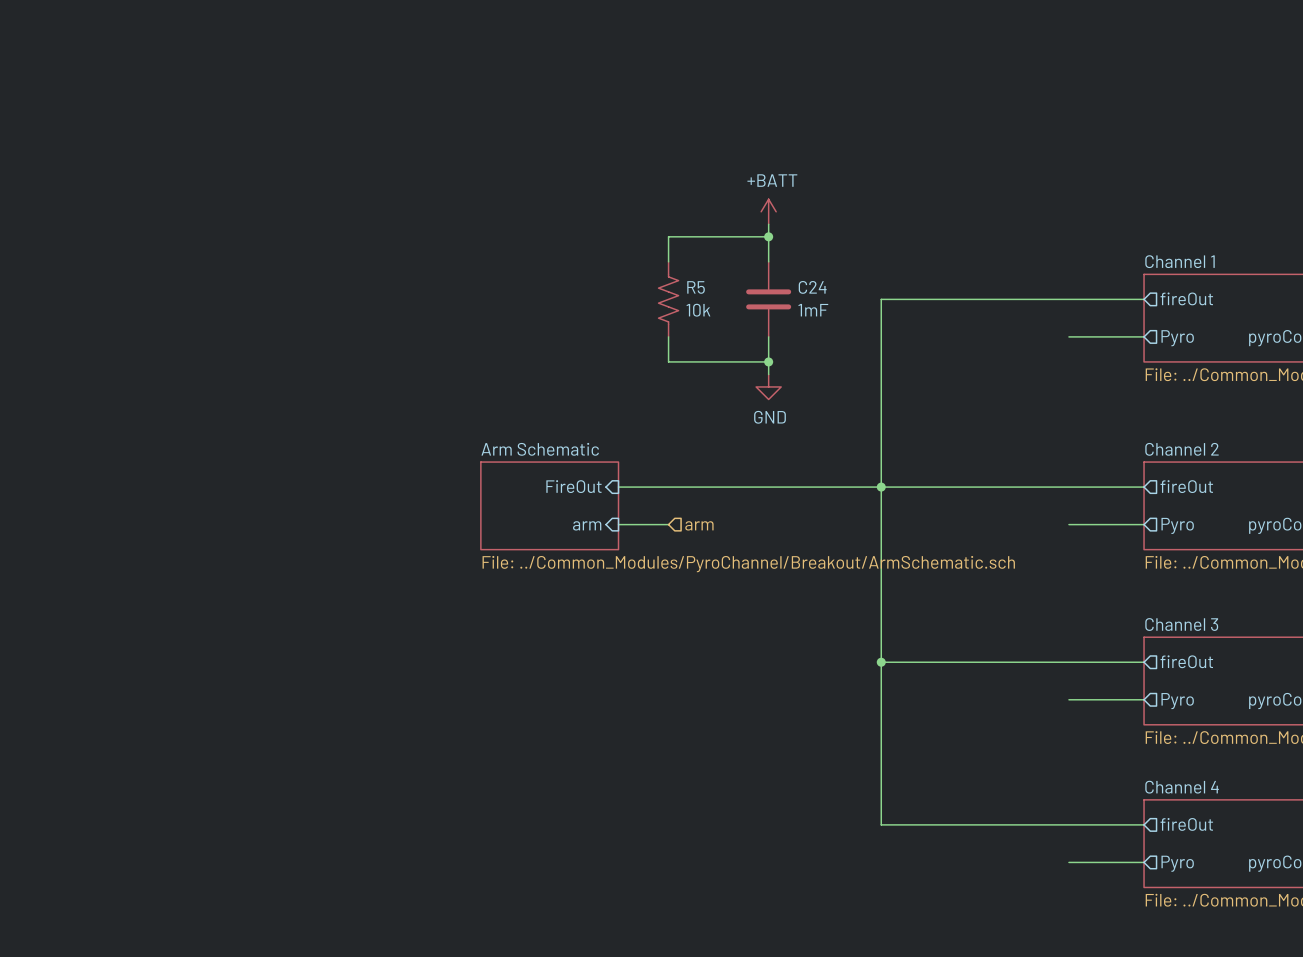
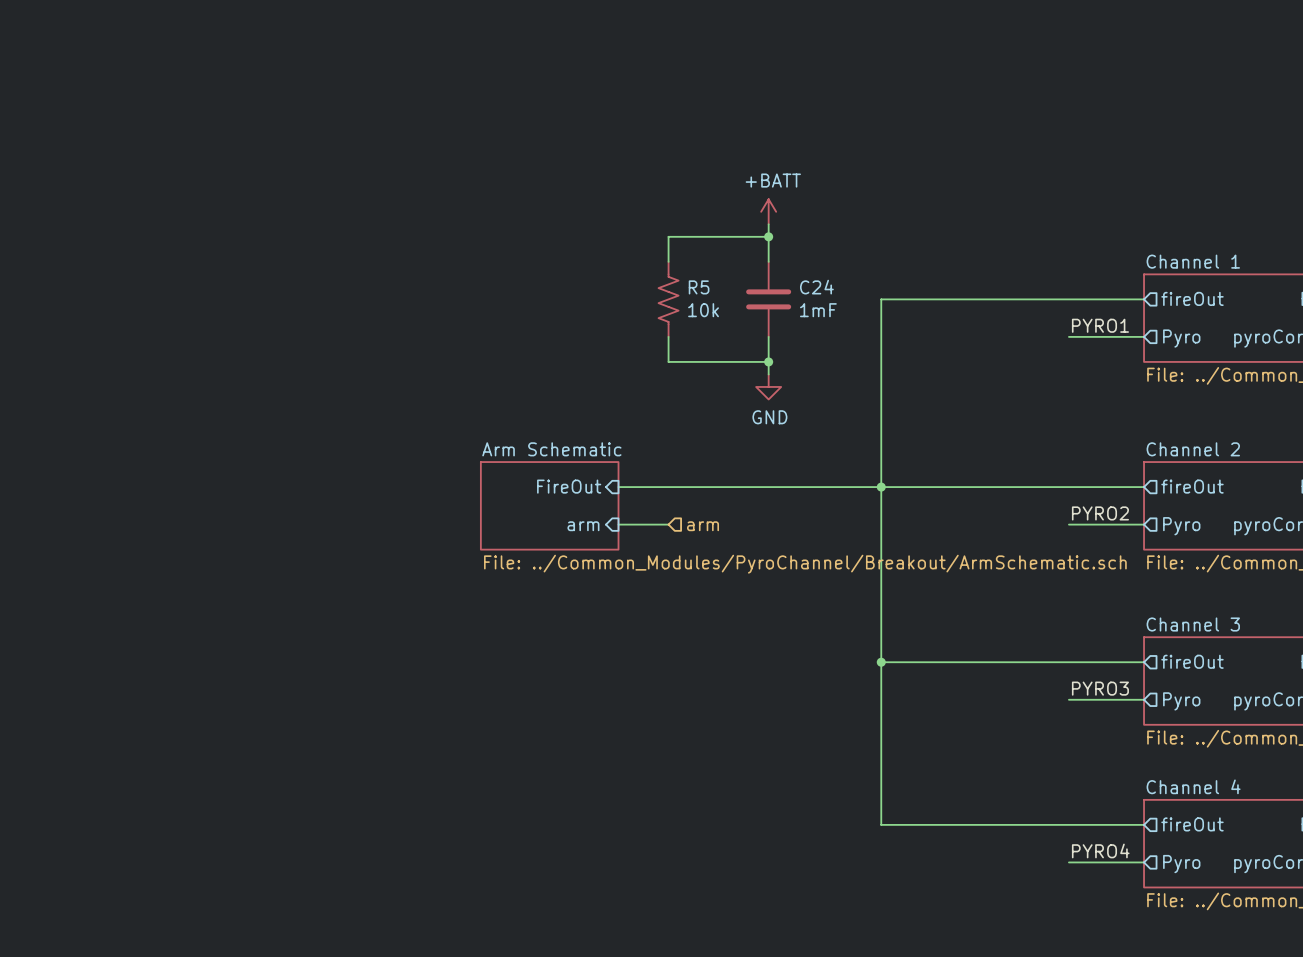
label: none -> PYRO1 (1100, 325)
label: none -> PYRO2 (1100, 513)
label: none -> PYRO3 (1100, 688)
label: none -> PYRO4 (1100, 850)

